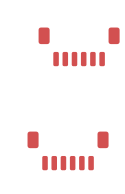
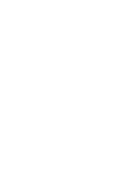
part: (79, 46) -> none
part: (68, 150) -> none

